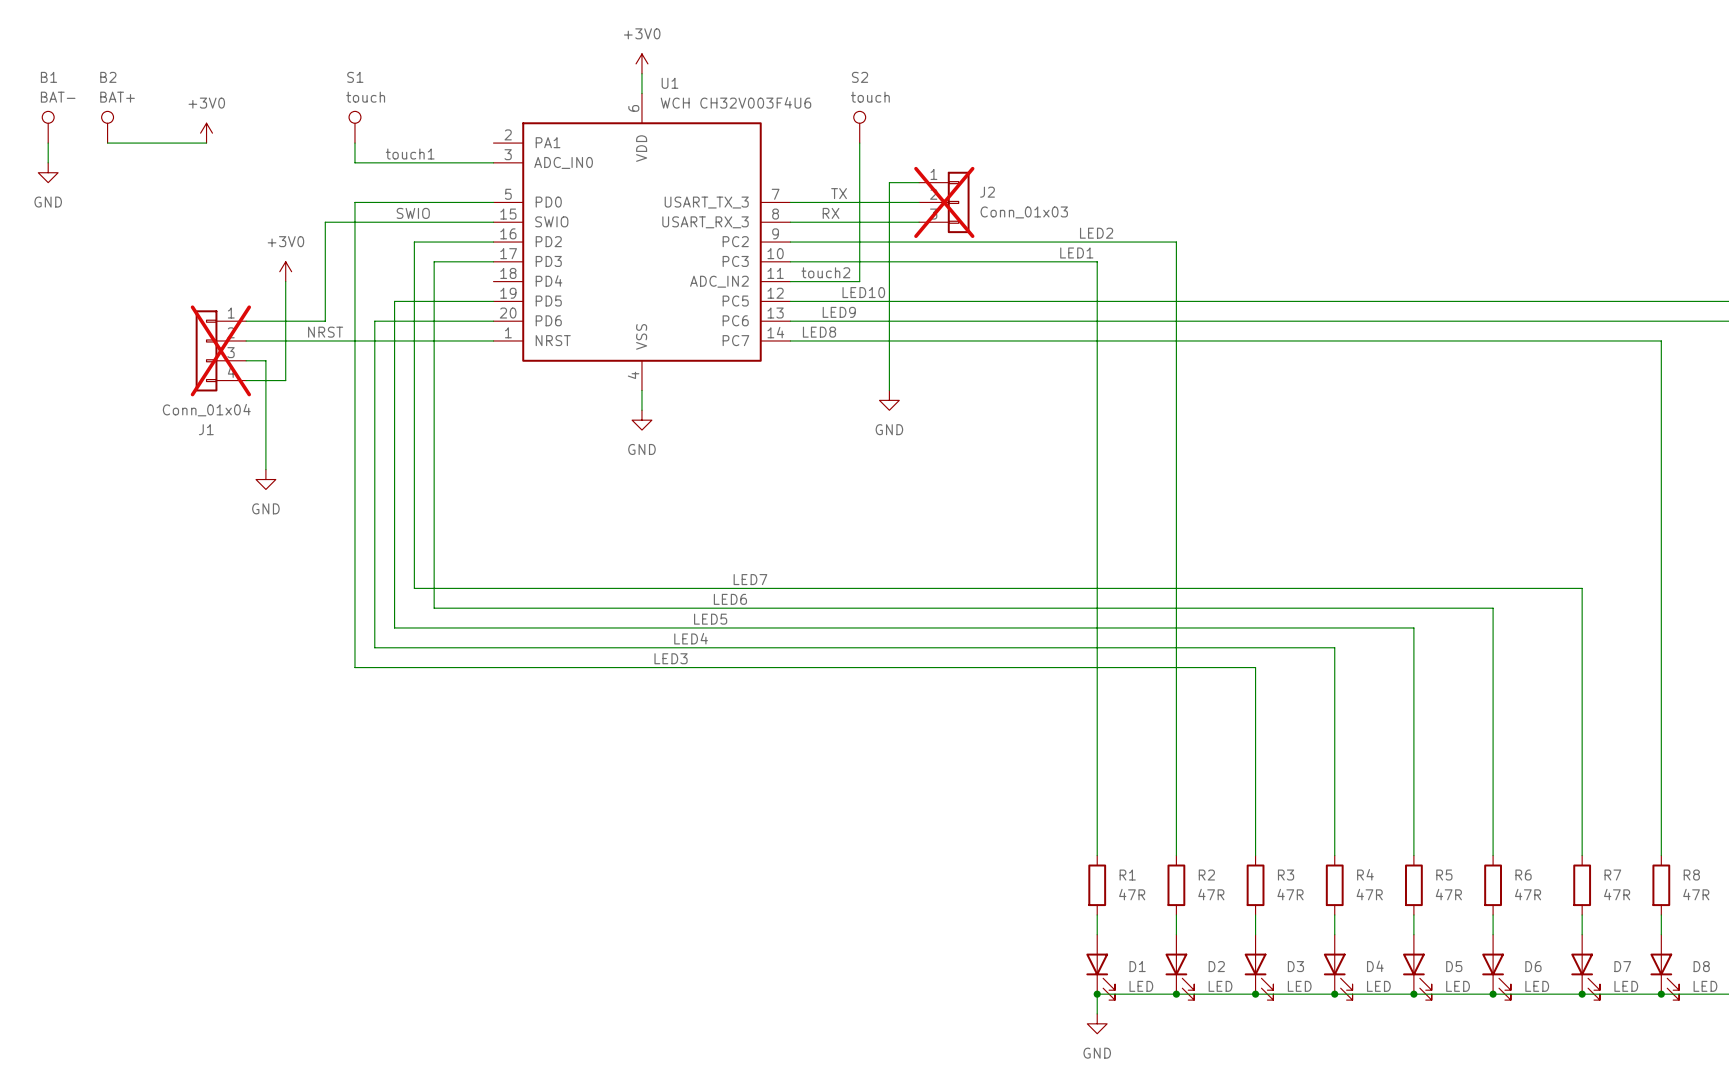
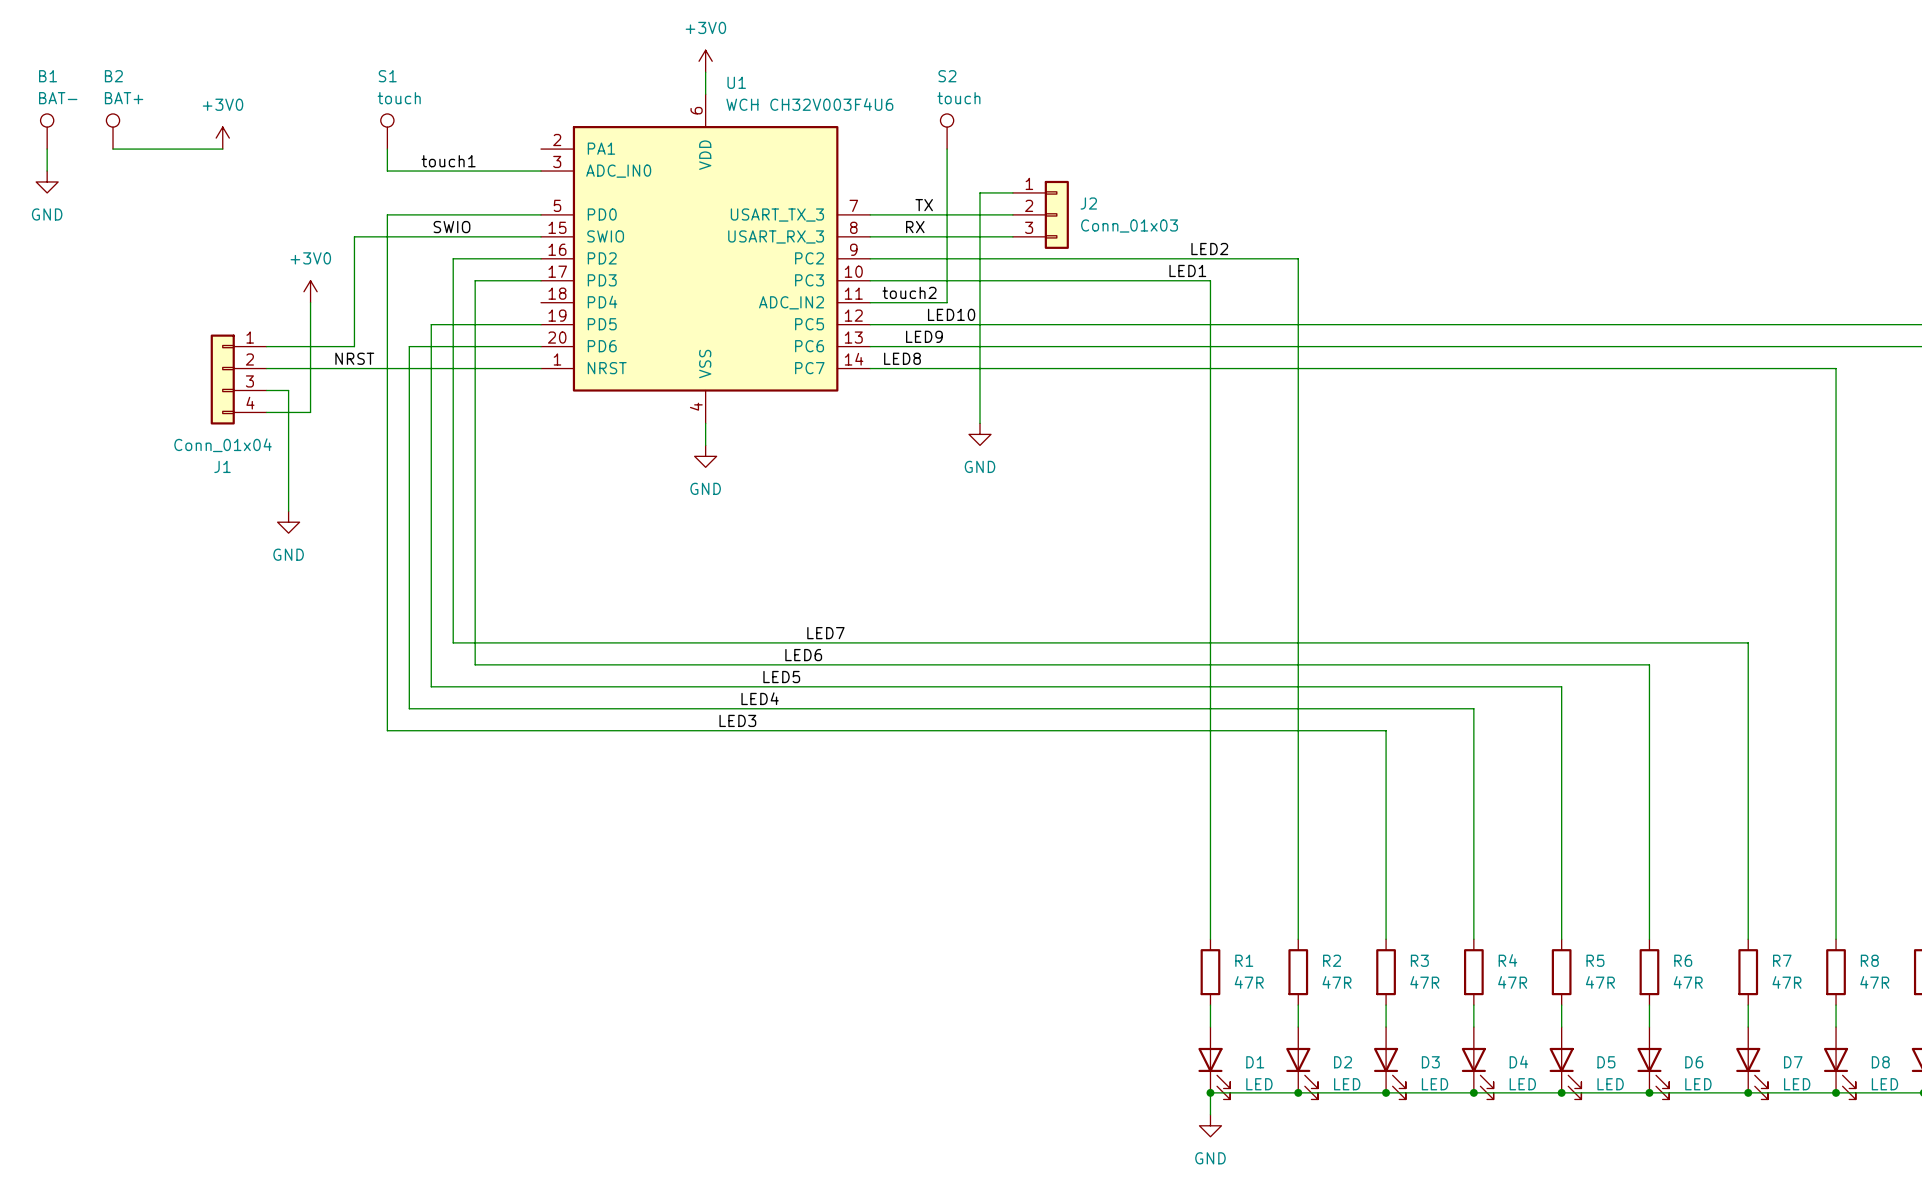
J2 do-not-place cross: (944, 202) -> none
J1 do-not-place cross: (220, 350) -> none

